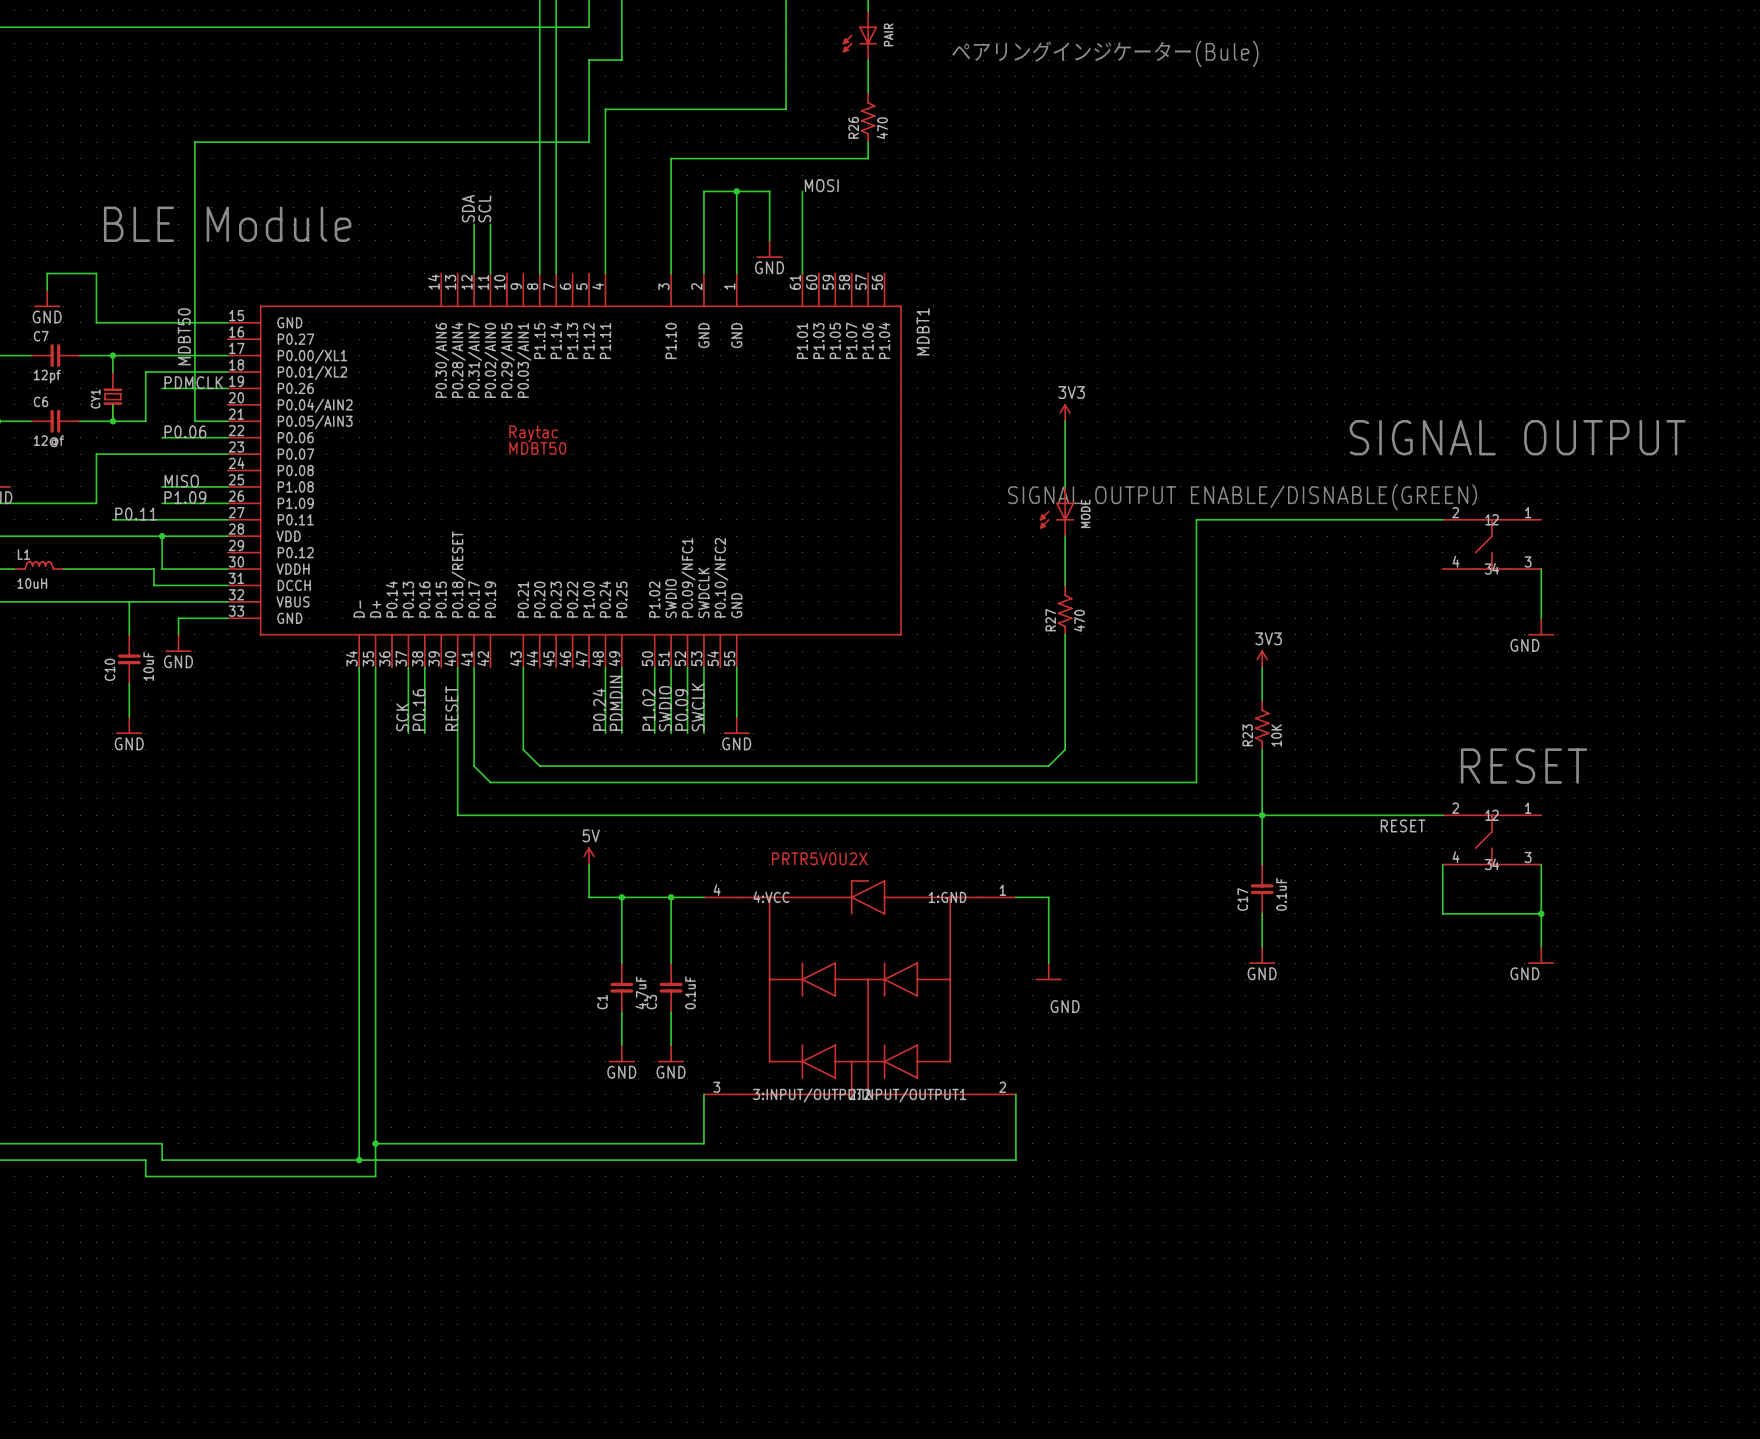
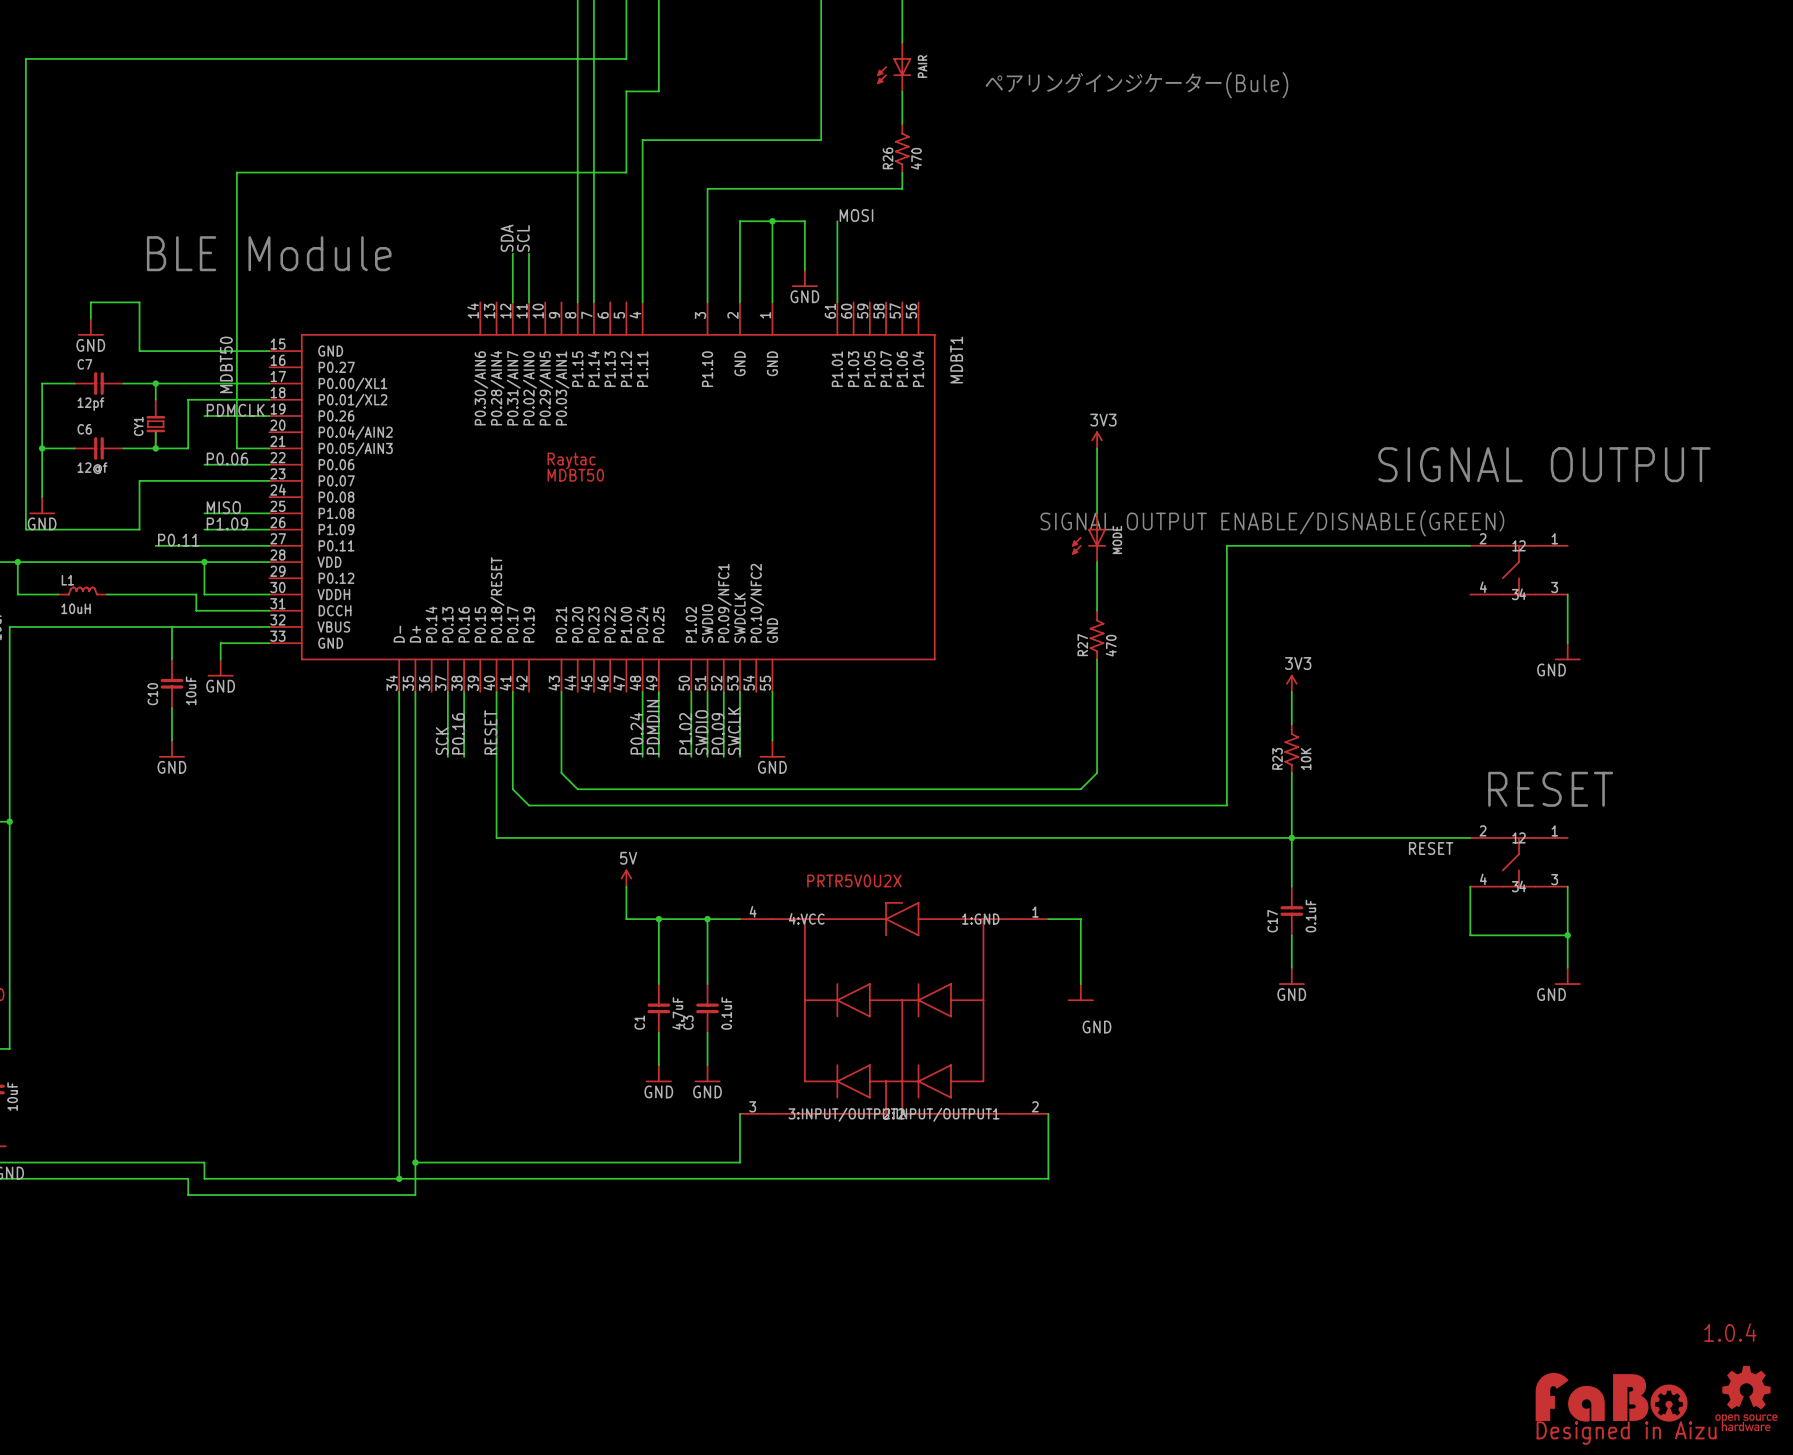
text: none -> 1.0.4 (1730, 1332)
part: none -> (1611, 1397)
part: none -> (1746, 1398)

